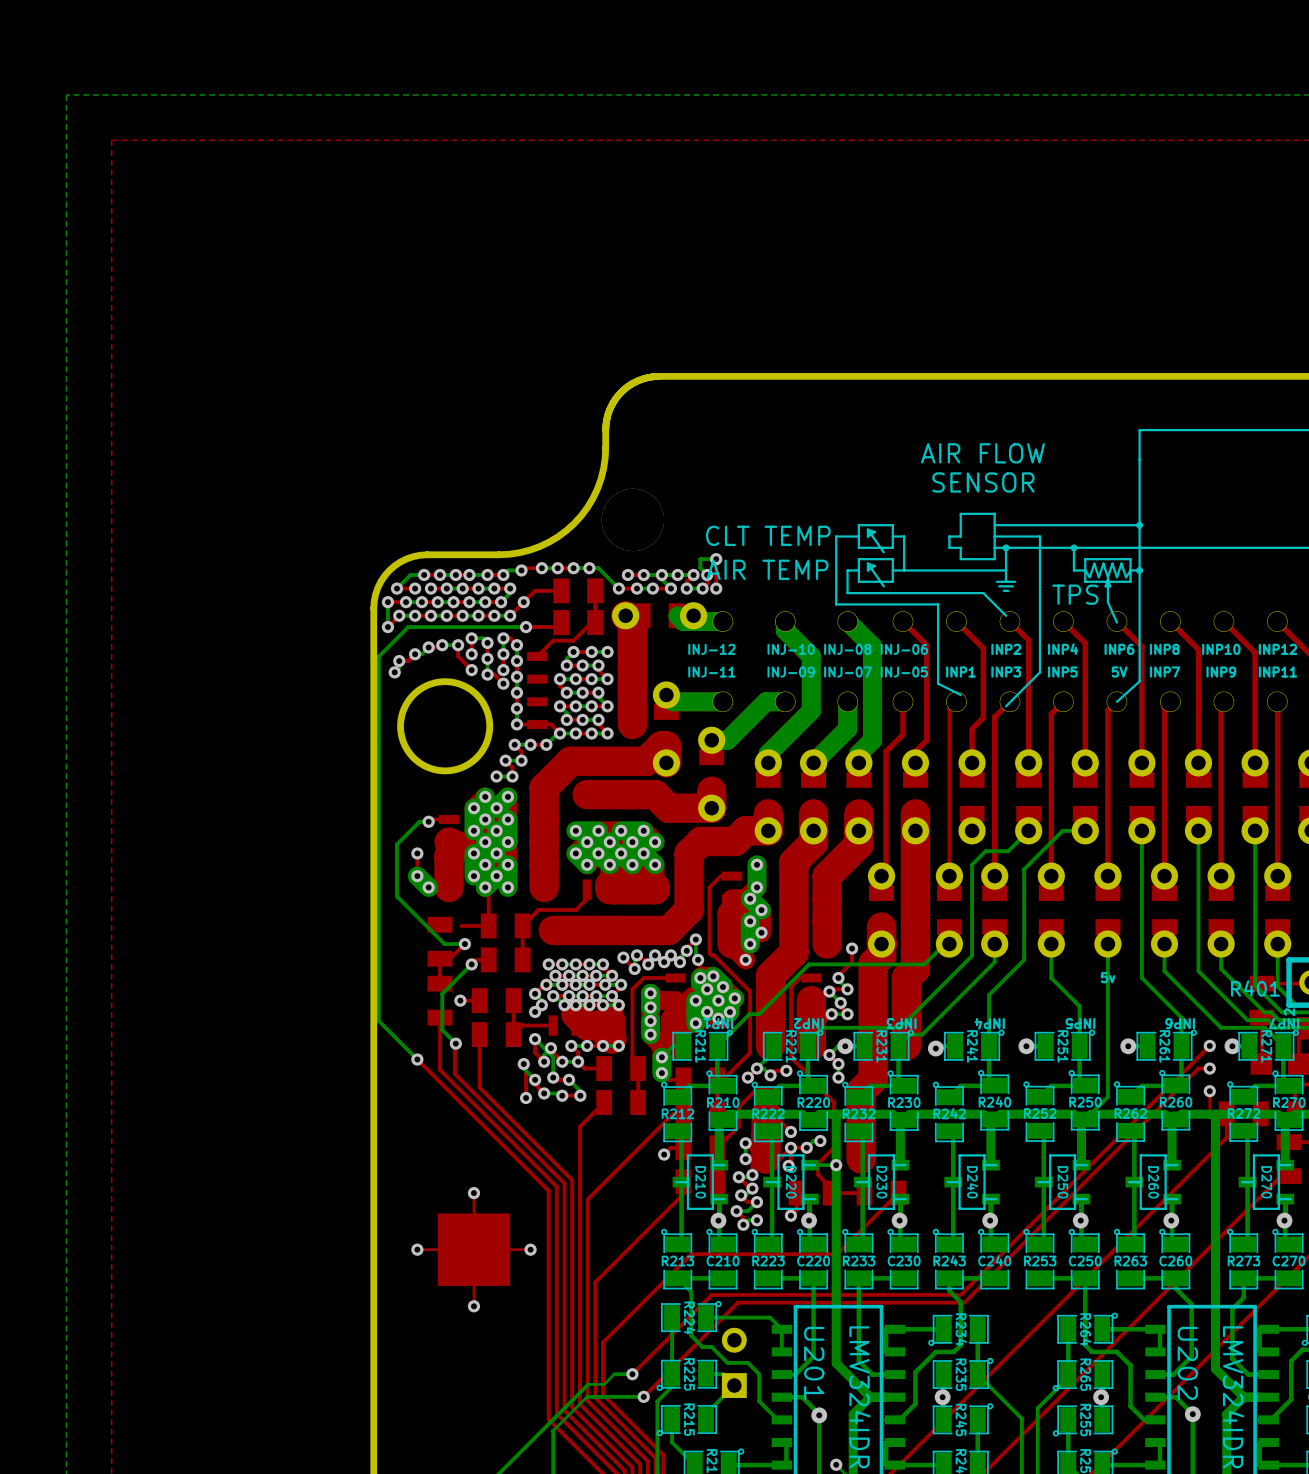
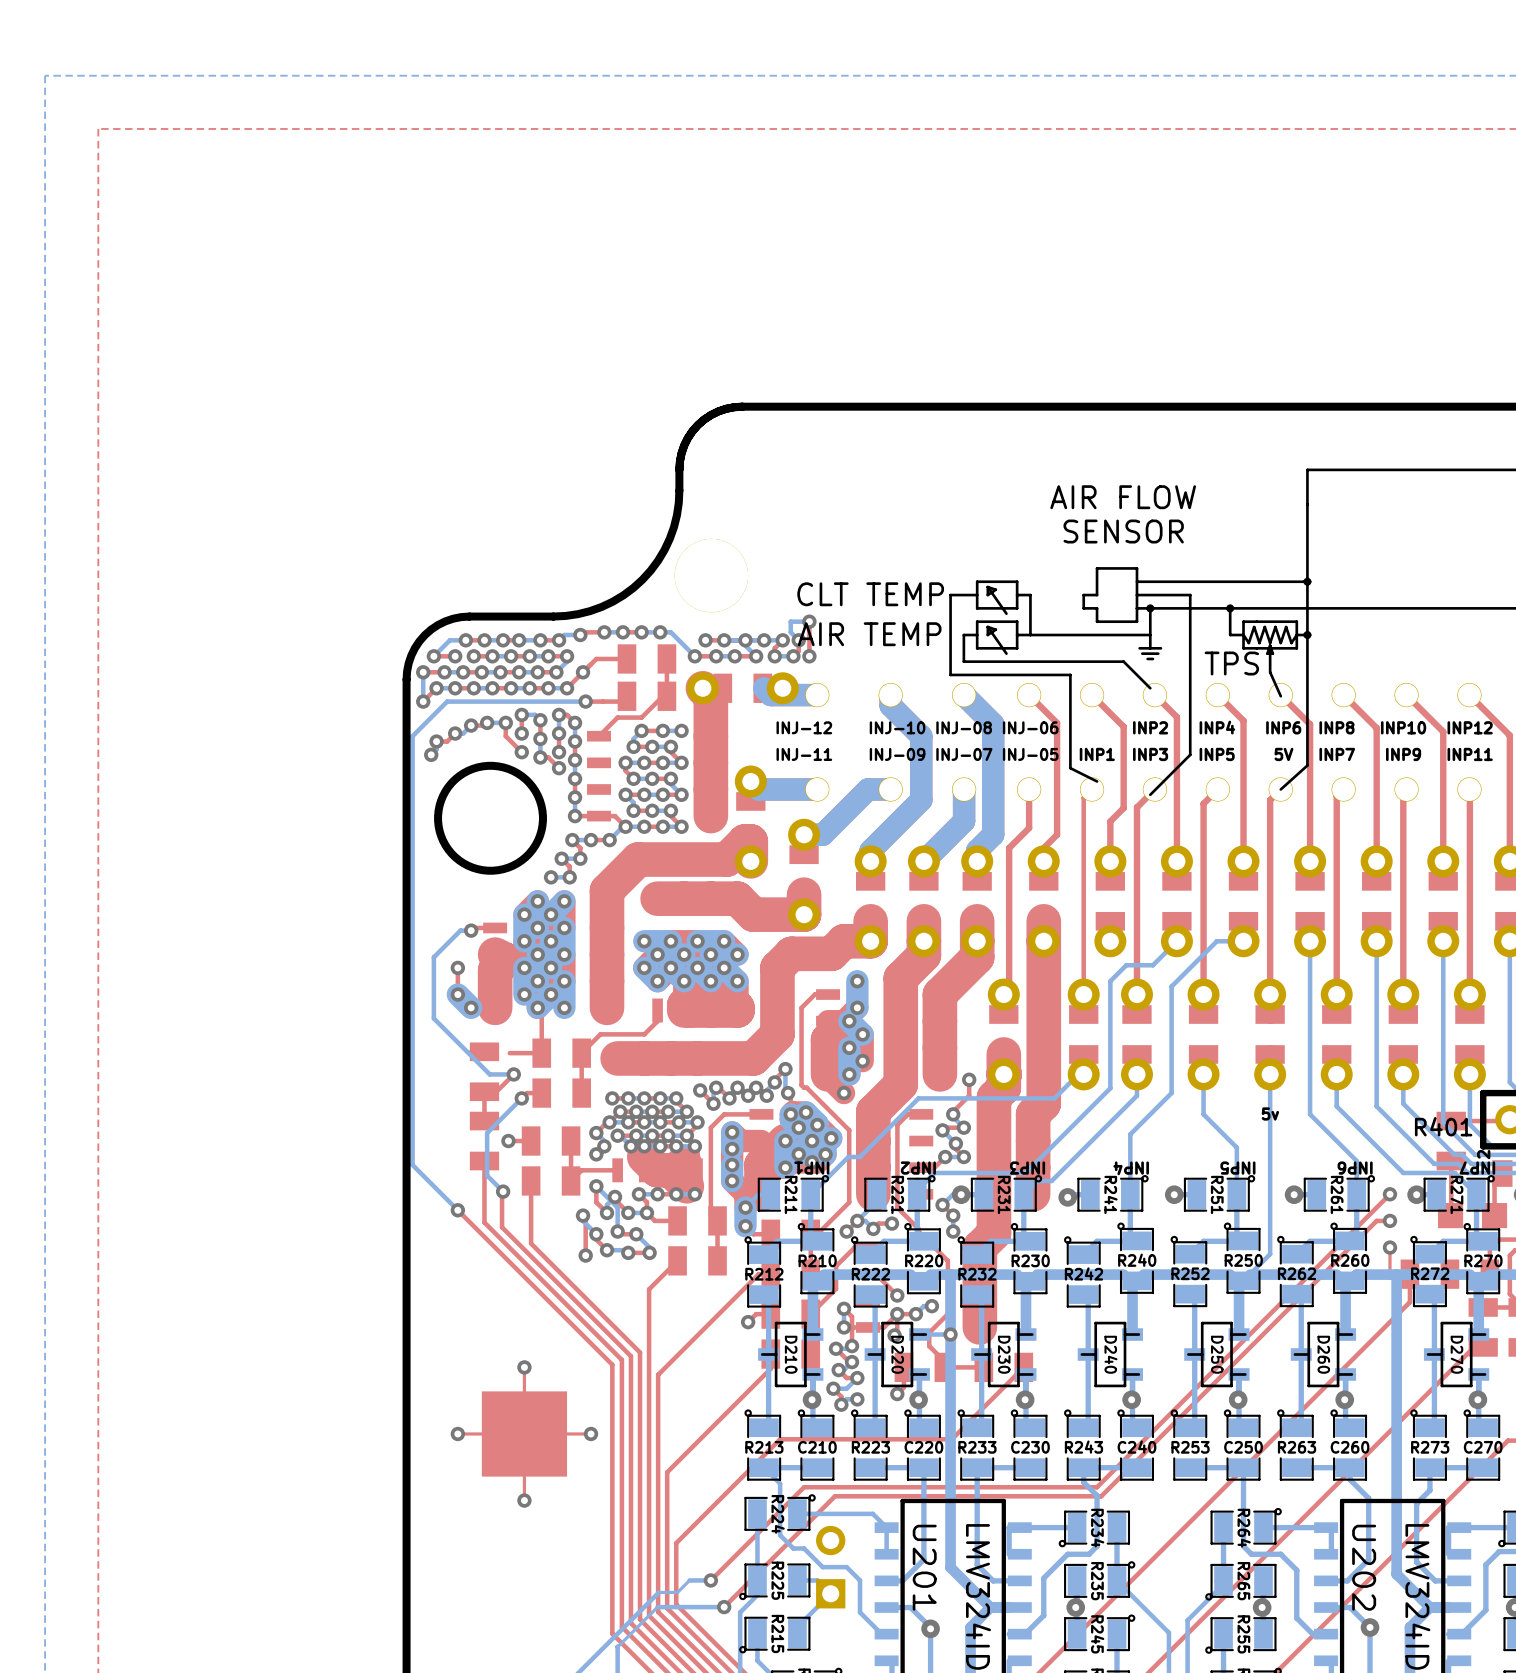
top track: (811, 1000) (811, 1045) -> none
top track: (766, 1113) (766, 1159) -> none

